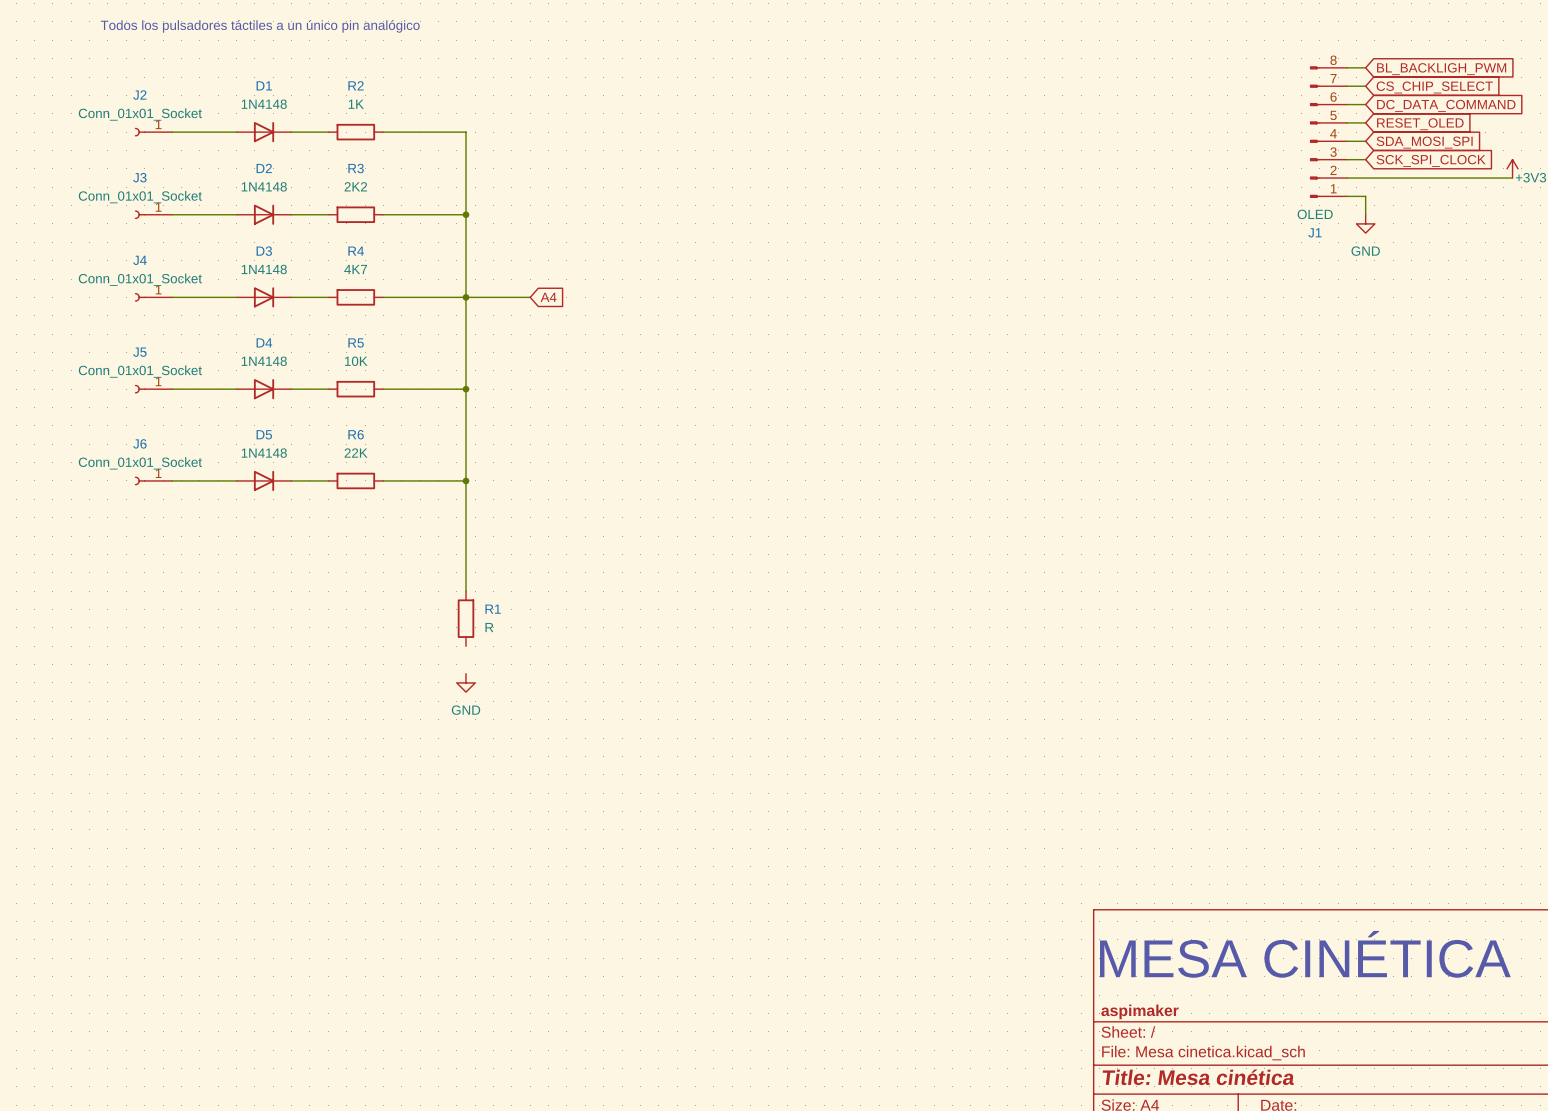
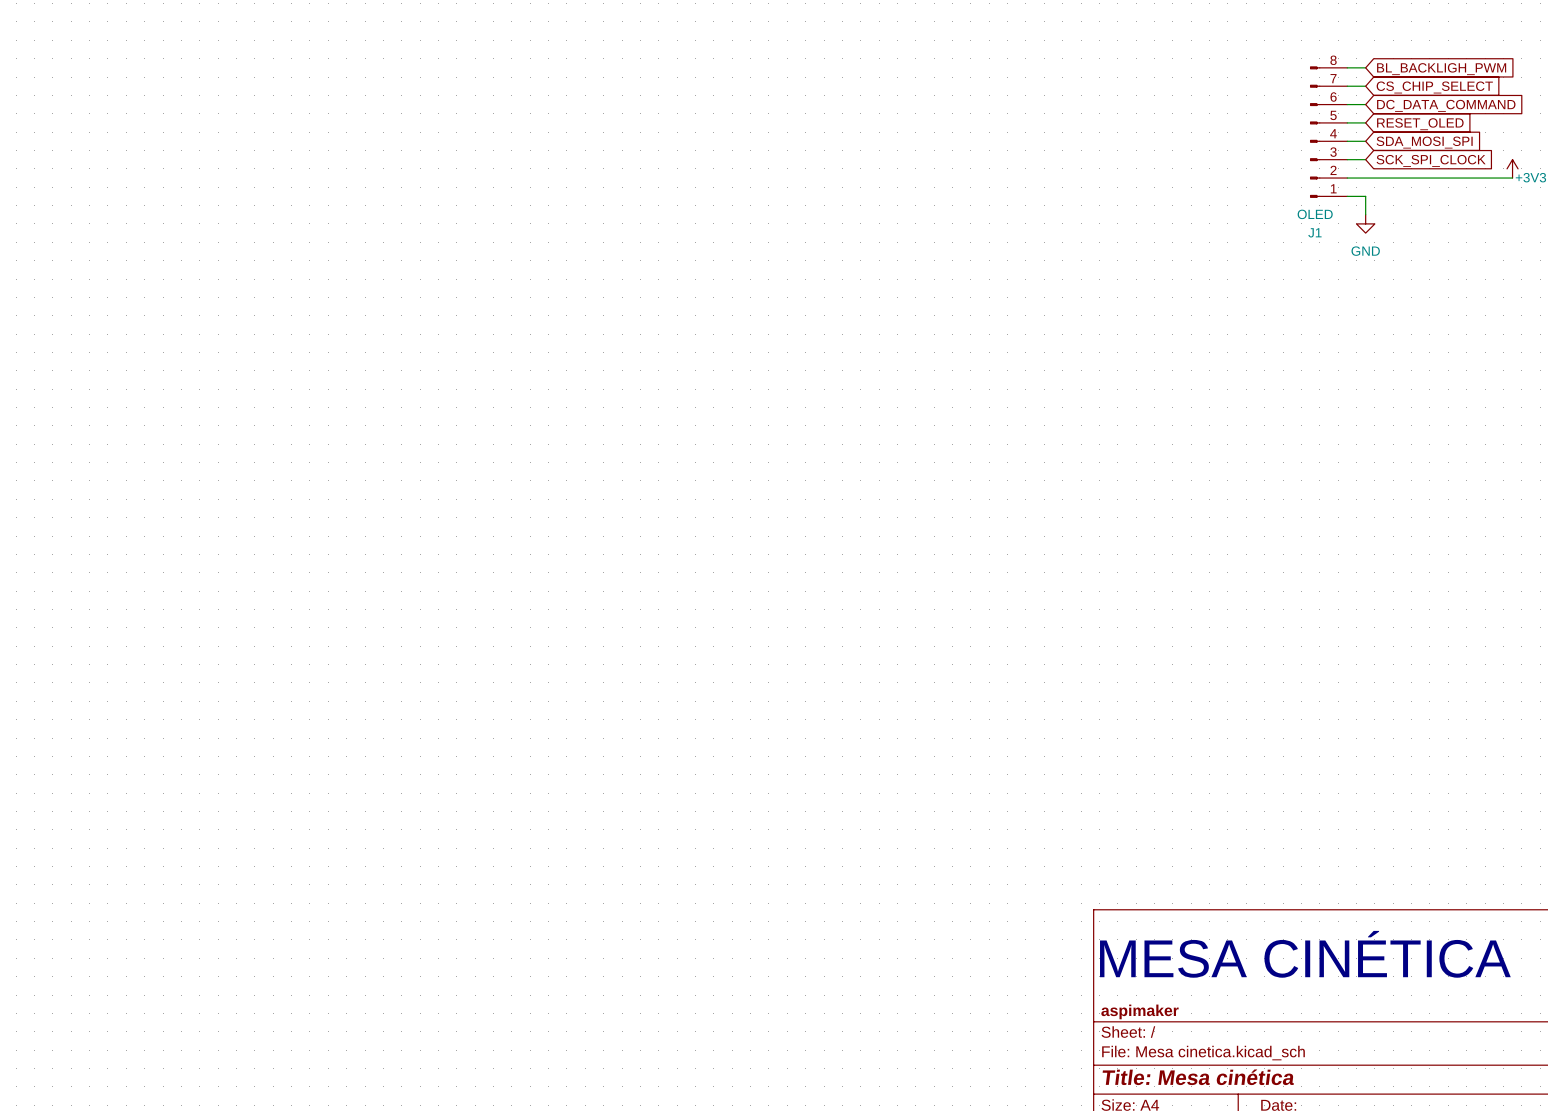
text: Todos los pulsadores táctiles a un único pin analógico (260, 26) -> none
J2: Conn_01x01_Socket (153, 132) -> none
wire: (172, 132) (236, 132) -> none
D1: 1N4148 (264, 132) -> none
wire: (291, 132) (328, 132) -> none
R2: 1K (355, 132) -> none
wire: (383, 132) (465, 132) (465, 591) -> none
J3: Conn_01x01_Socket (153, 214) -> none
wire: (172, 214) (236, 214) -> none
D2: 1N4148 (264, 214) -> none
wire: (291, 214) (328, 214) -> none
R3: 2K2 (355, 214) -> none
wire: (383, 214) (465, 214) -> none
junction: (465, 214) -> none
J4: Conn_01x01_Socket (153, 297) -> none
wire: (172, 297) (236, 297) -> none
D3: 1N4148 (264, 297) -> none
wire: (291, 297) (328, 297) -> none
R4: 4K7 (355, 297) -> none
wire: (383, 297) (530, 297) -> none
junction: (465, 297) -> none
global label: A4 (548, 297) -> none
J5: Conn_01x01_Socket (153, 389) -> none
wire: (172, 389) (236, 389) -> none
D4: 1N4148 (264, 389) -> none
wire: (291, 389) (328, 389) -> none
R5: 10K (355, 389) -> none
wire: (383, 389) (465, 389) -> none
junction: (465, 389) -> none
J6: Conn_01x01_Socket (153, 480) -> none
wire: (172, 480) (236, 480) -> none
D5: 1N4148 (264, 480) -> none
wire: (291, 480) (328, 480) -> none
R6: 22K (355, 480) -> none
wire: (383, 480) (465, 480) -> none
junction: (465, 480) -> none
R1: R (465, 618) -> none
power symbol: GND (465, 682) -> none

